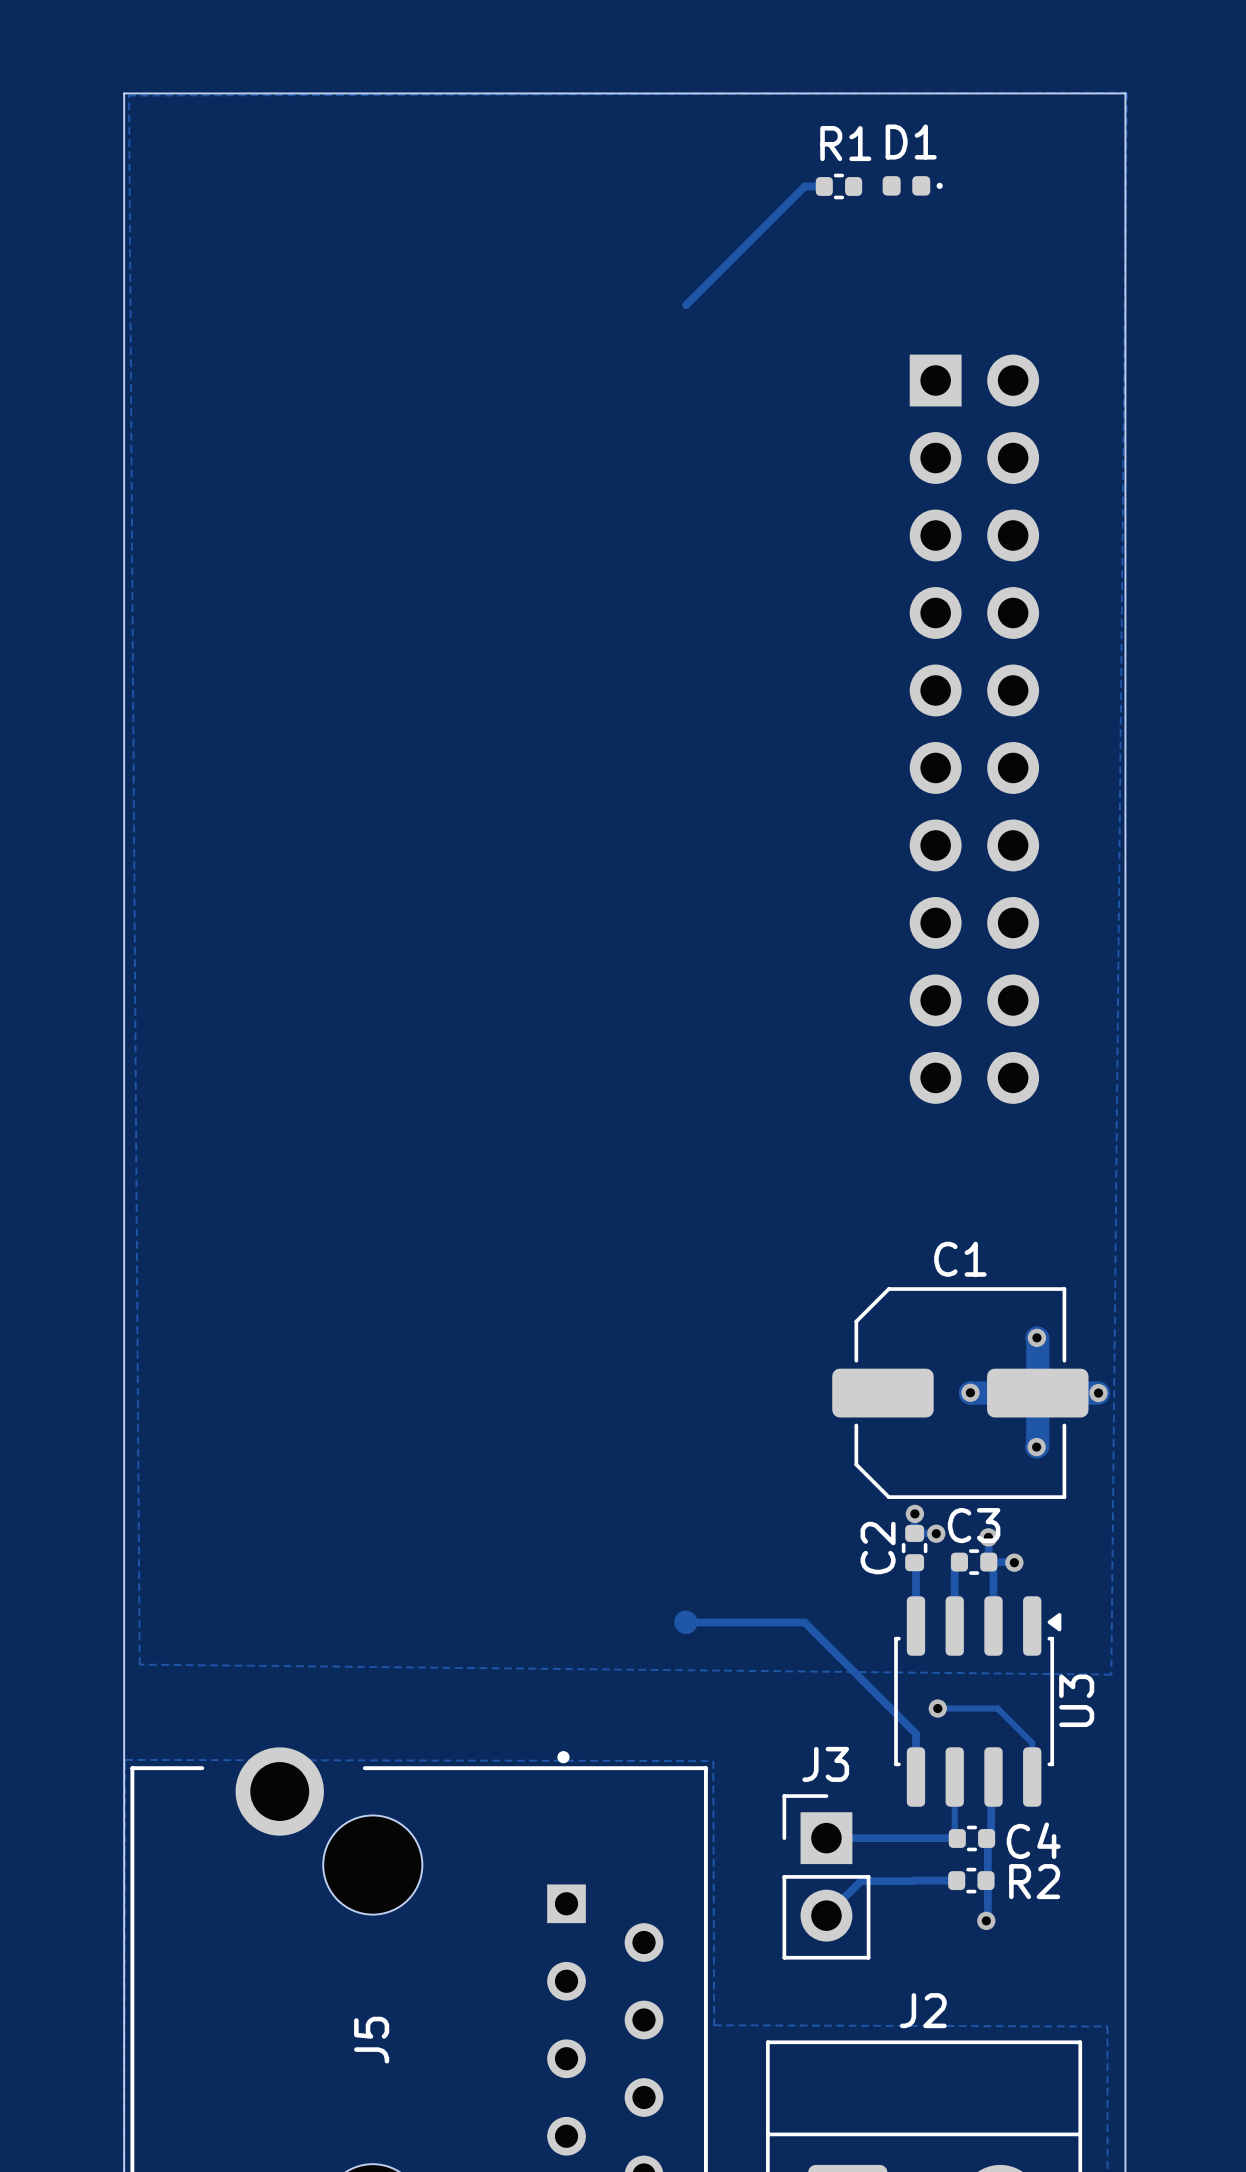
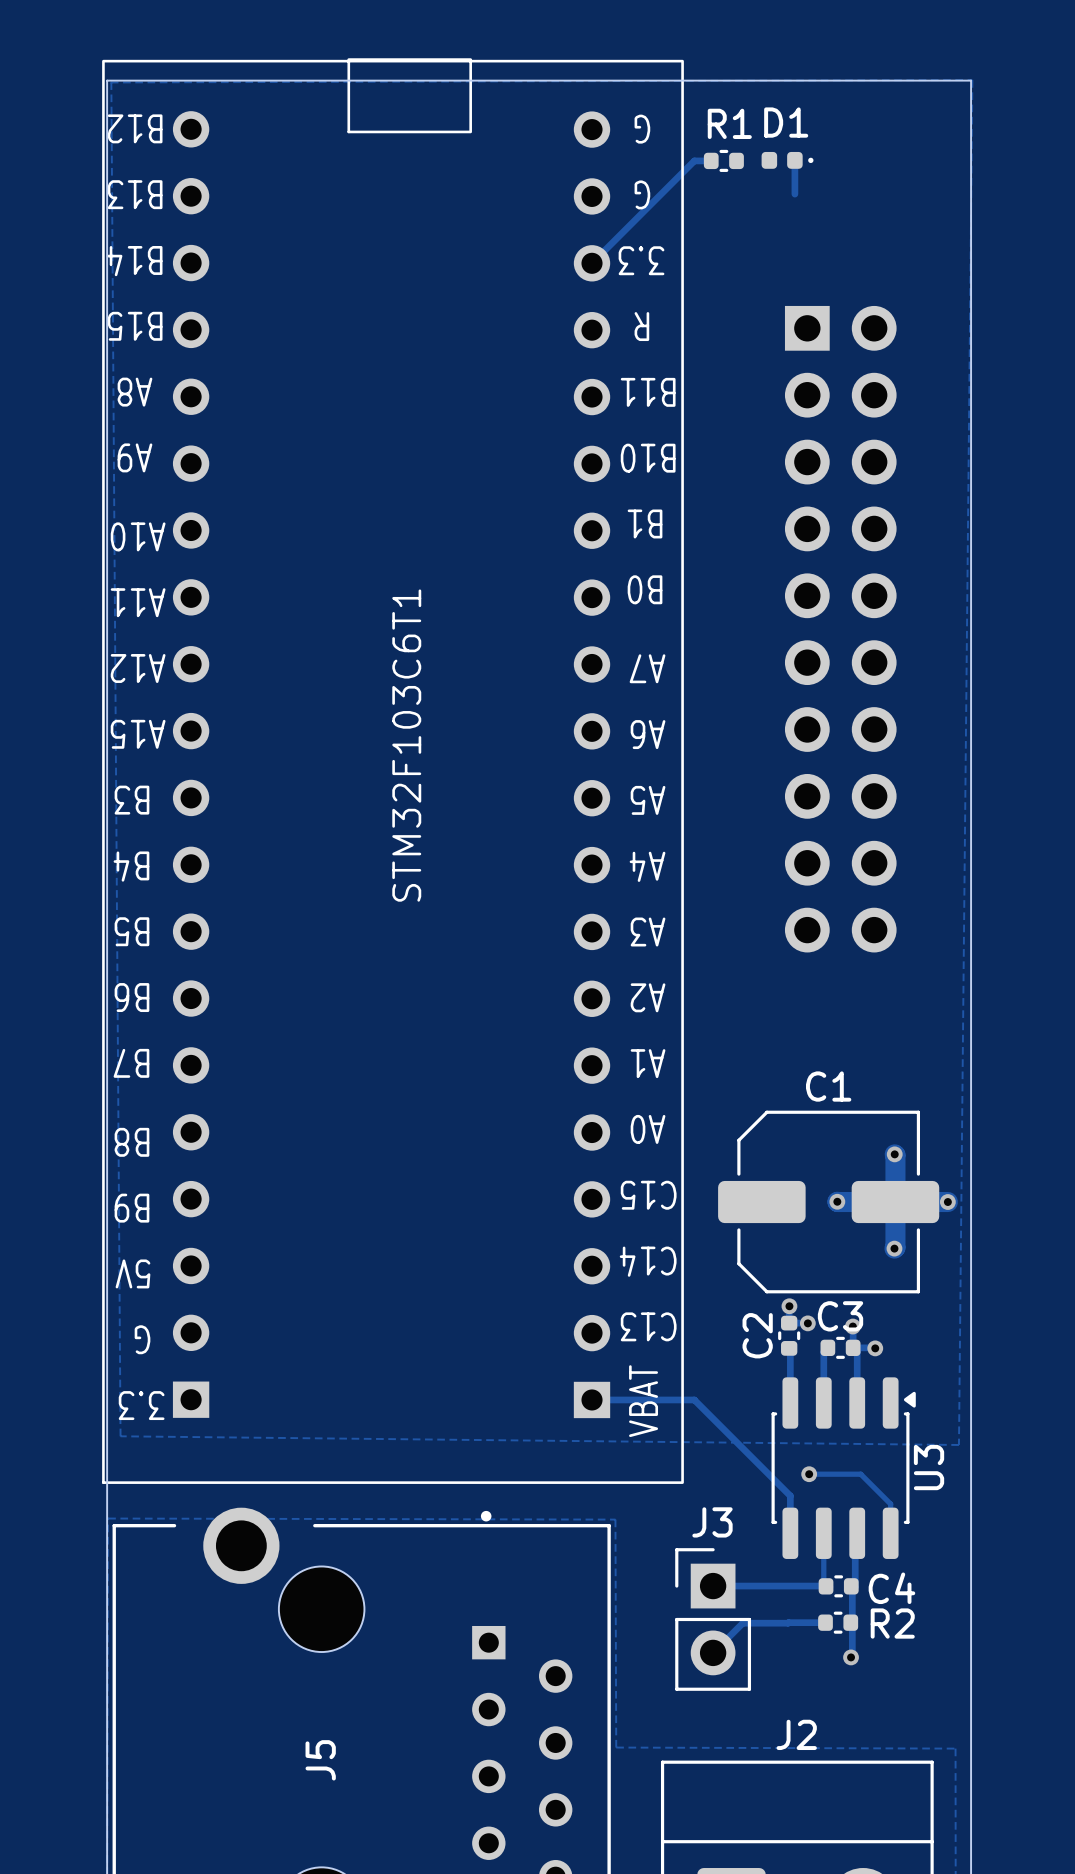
track: none -> (794, 160) (794, 194)
STM32F103C6T1: none -> (393, 771)

